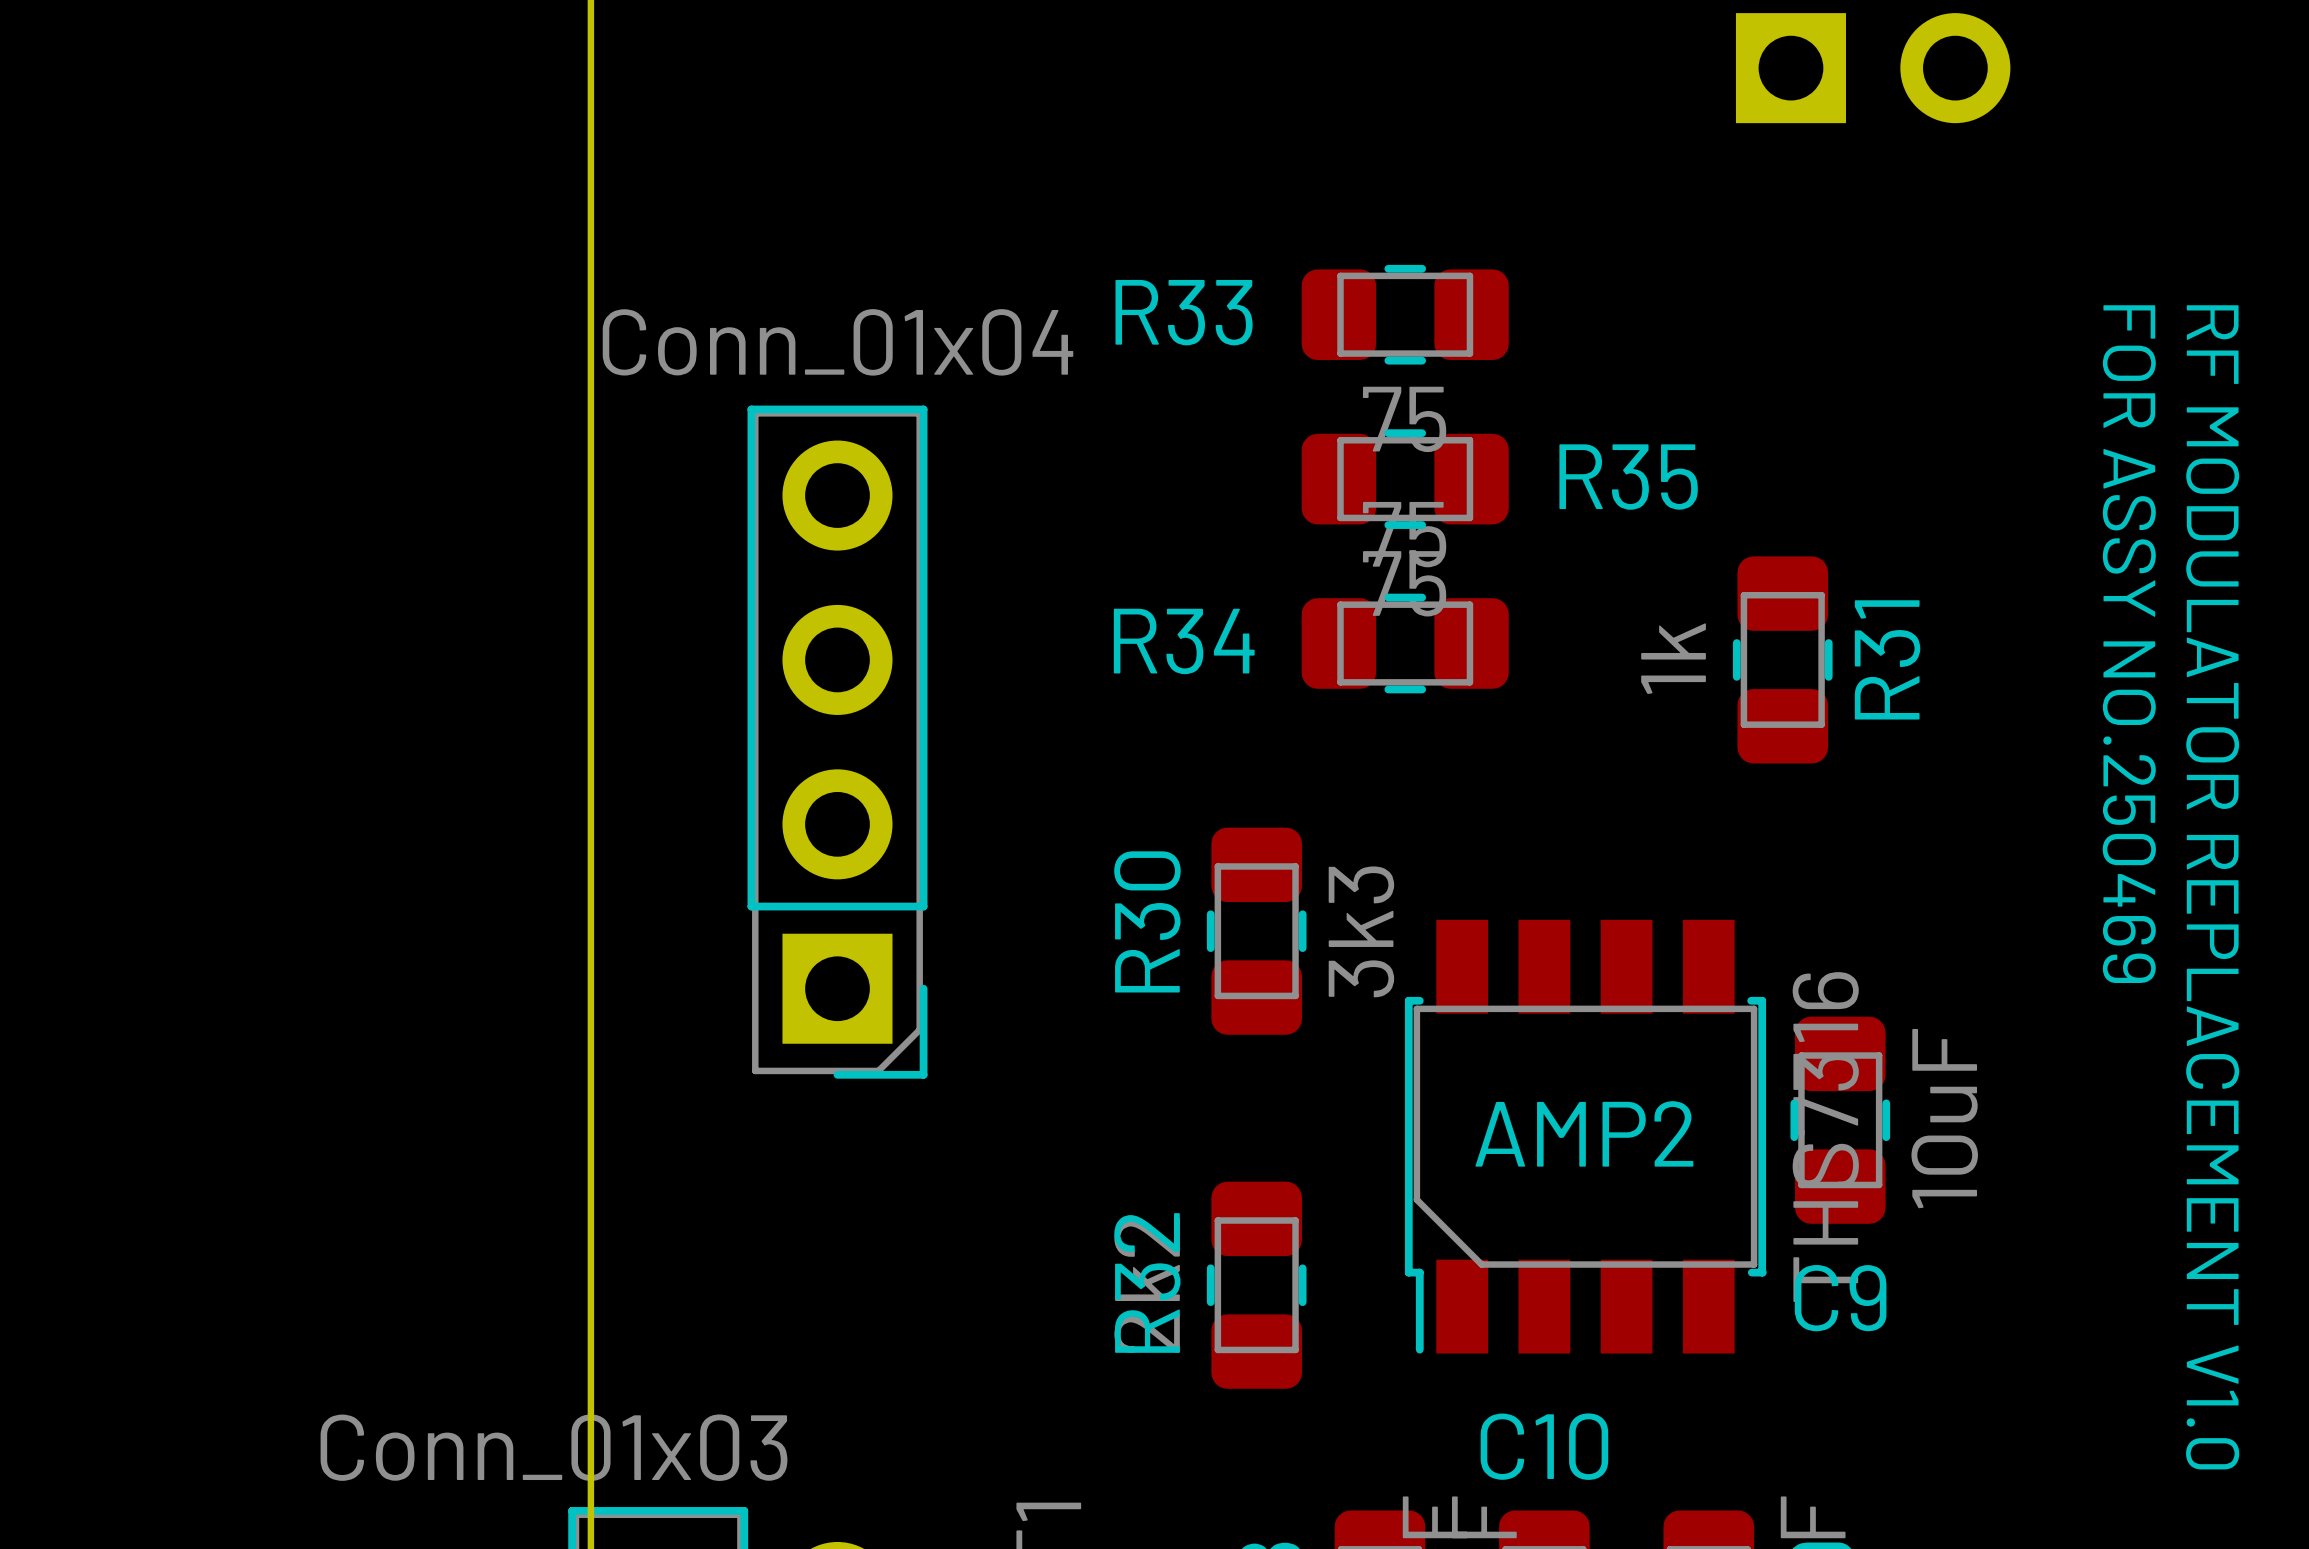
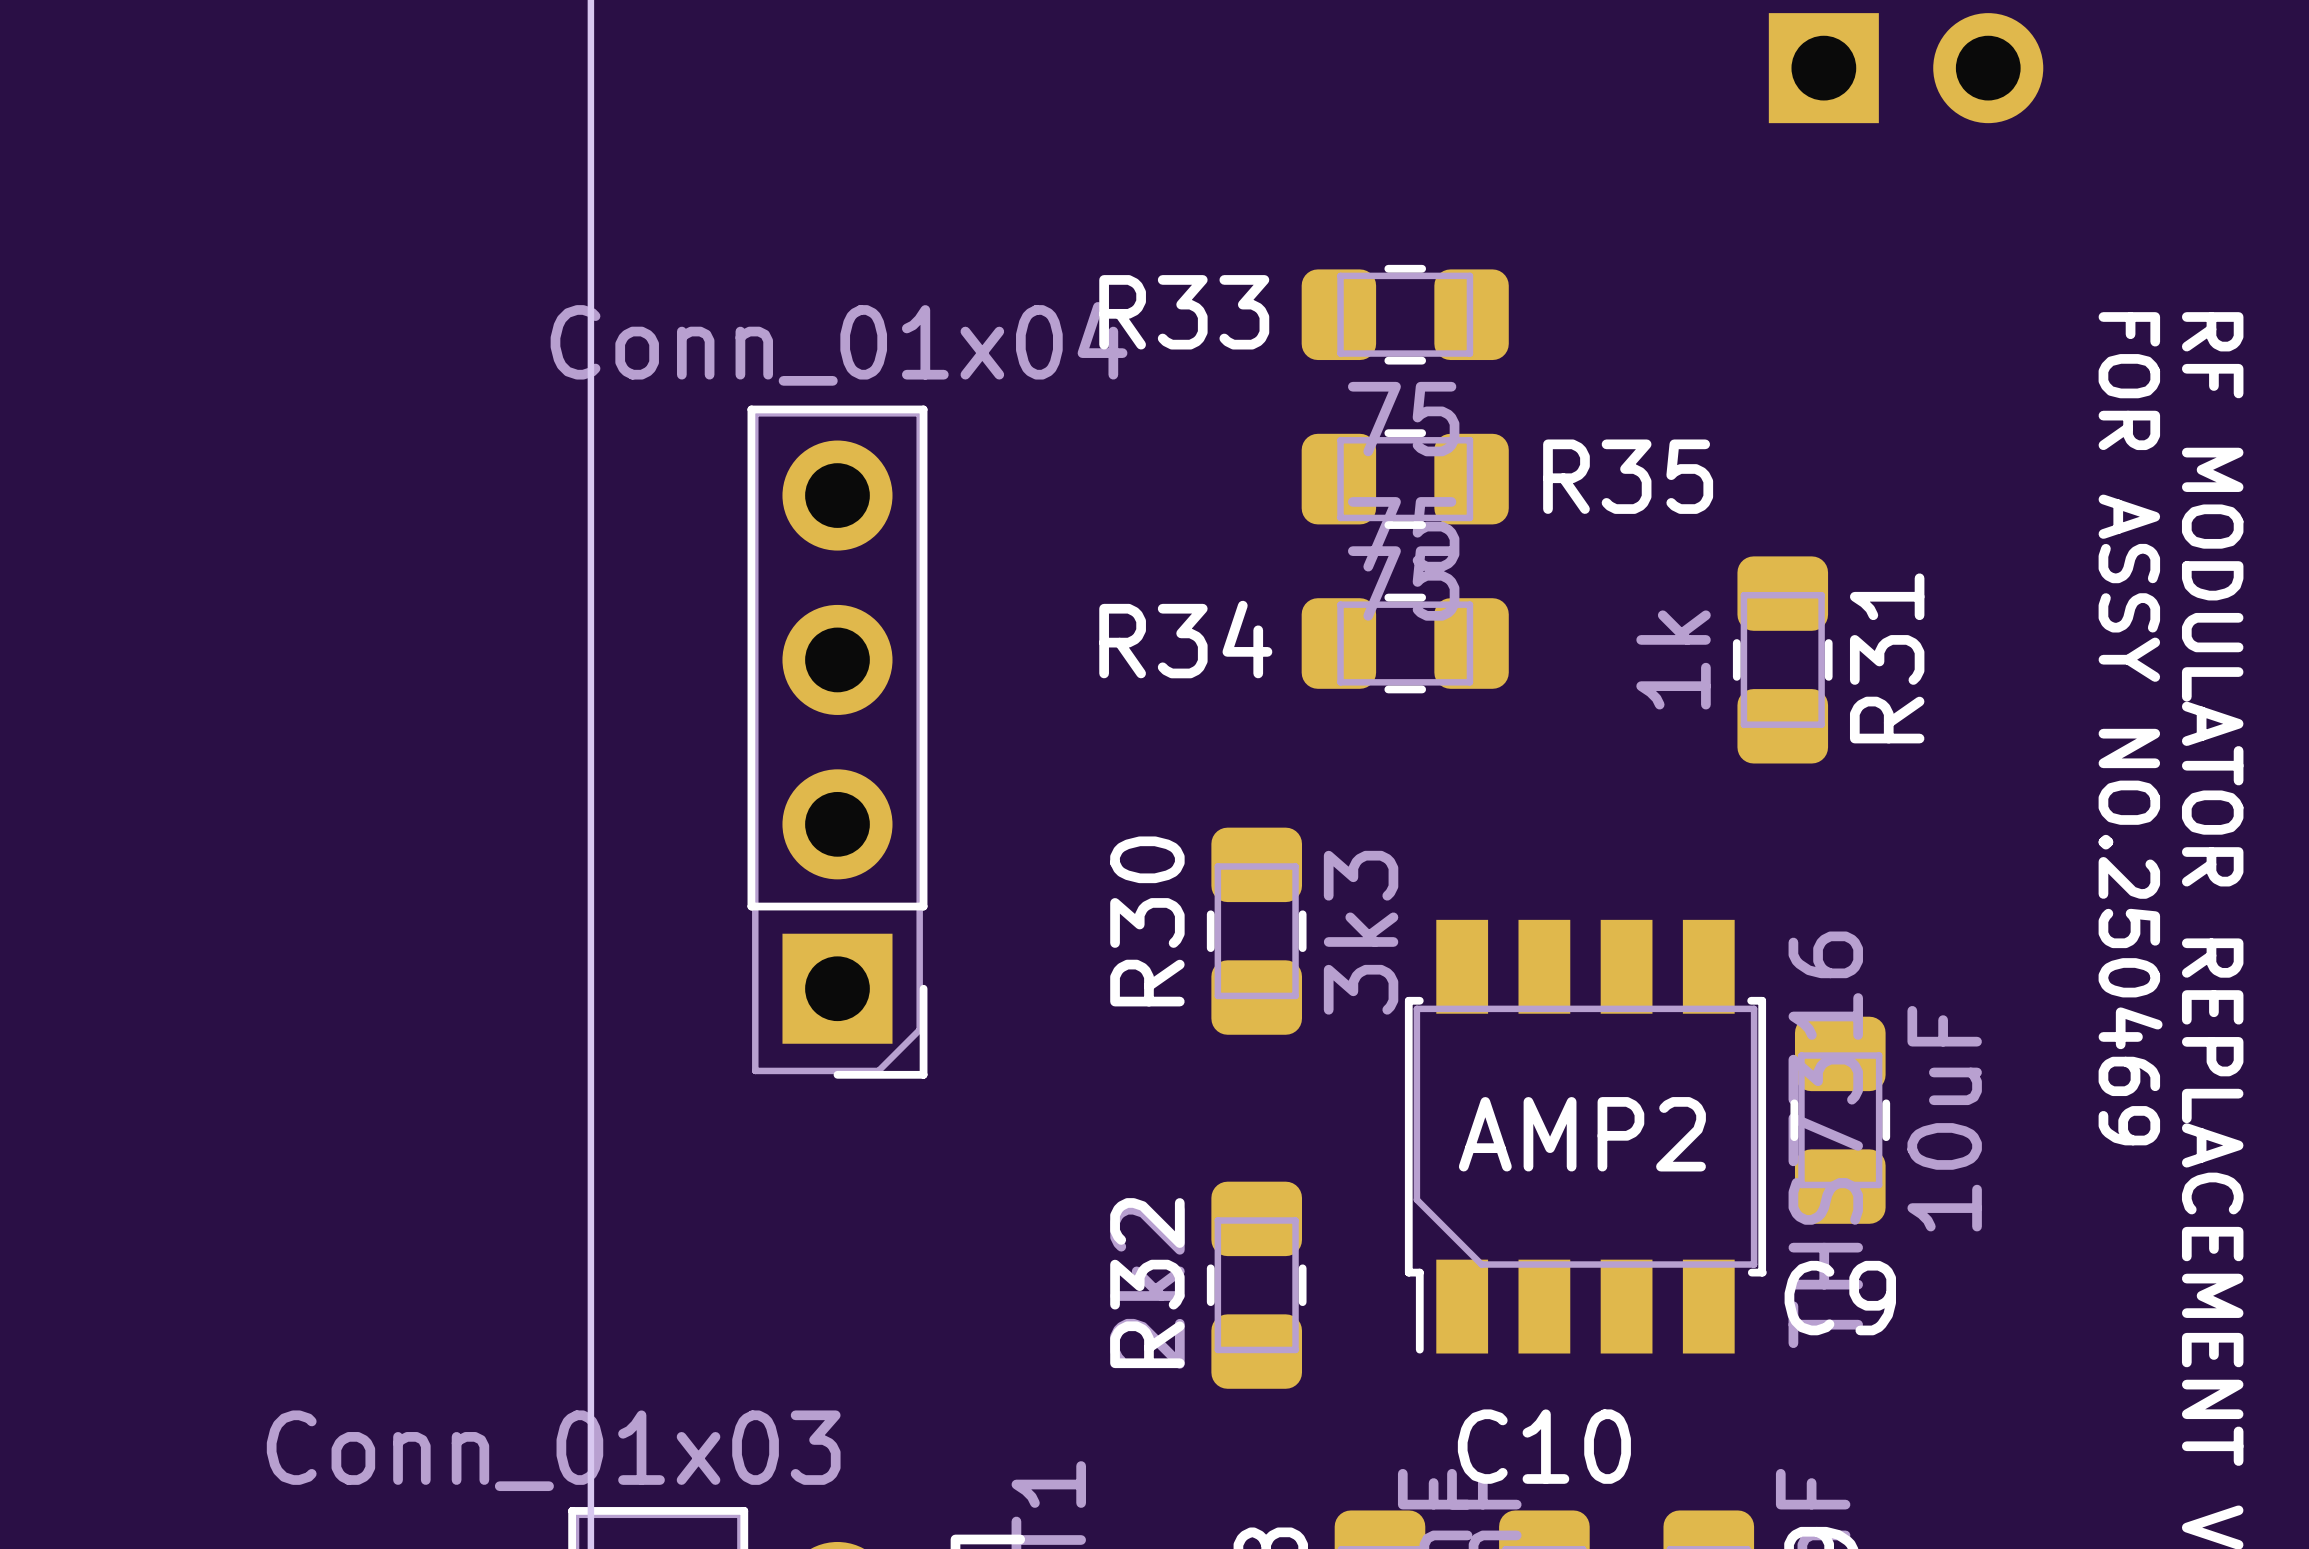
part position: (1873, 68) -> (1906, 68)

